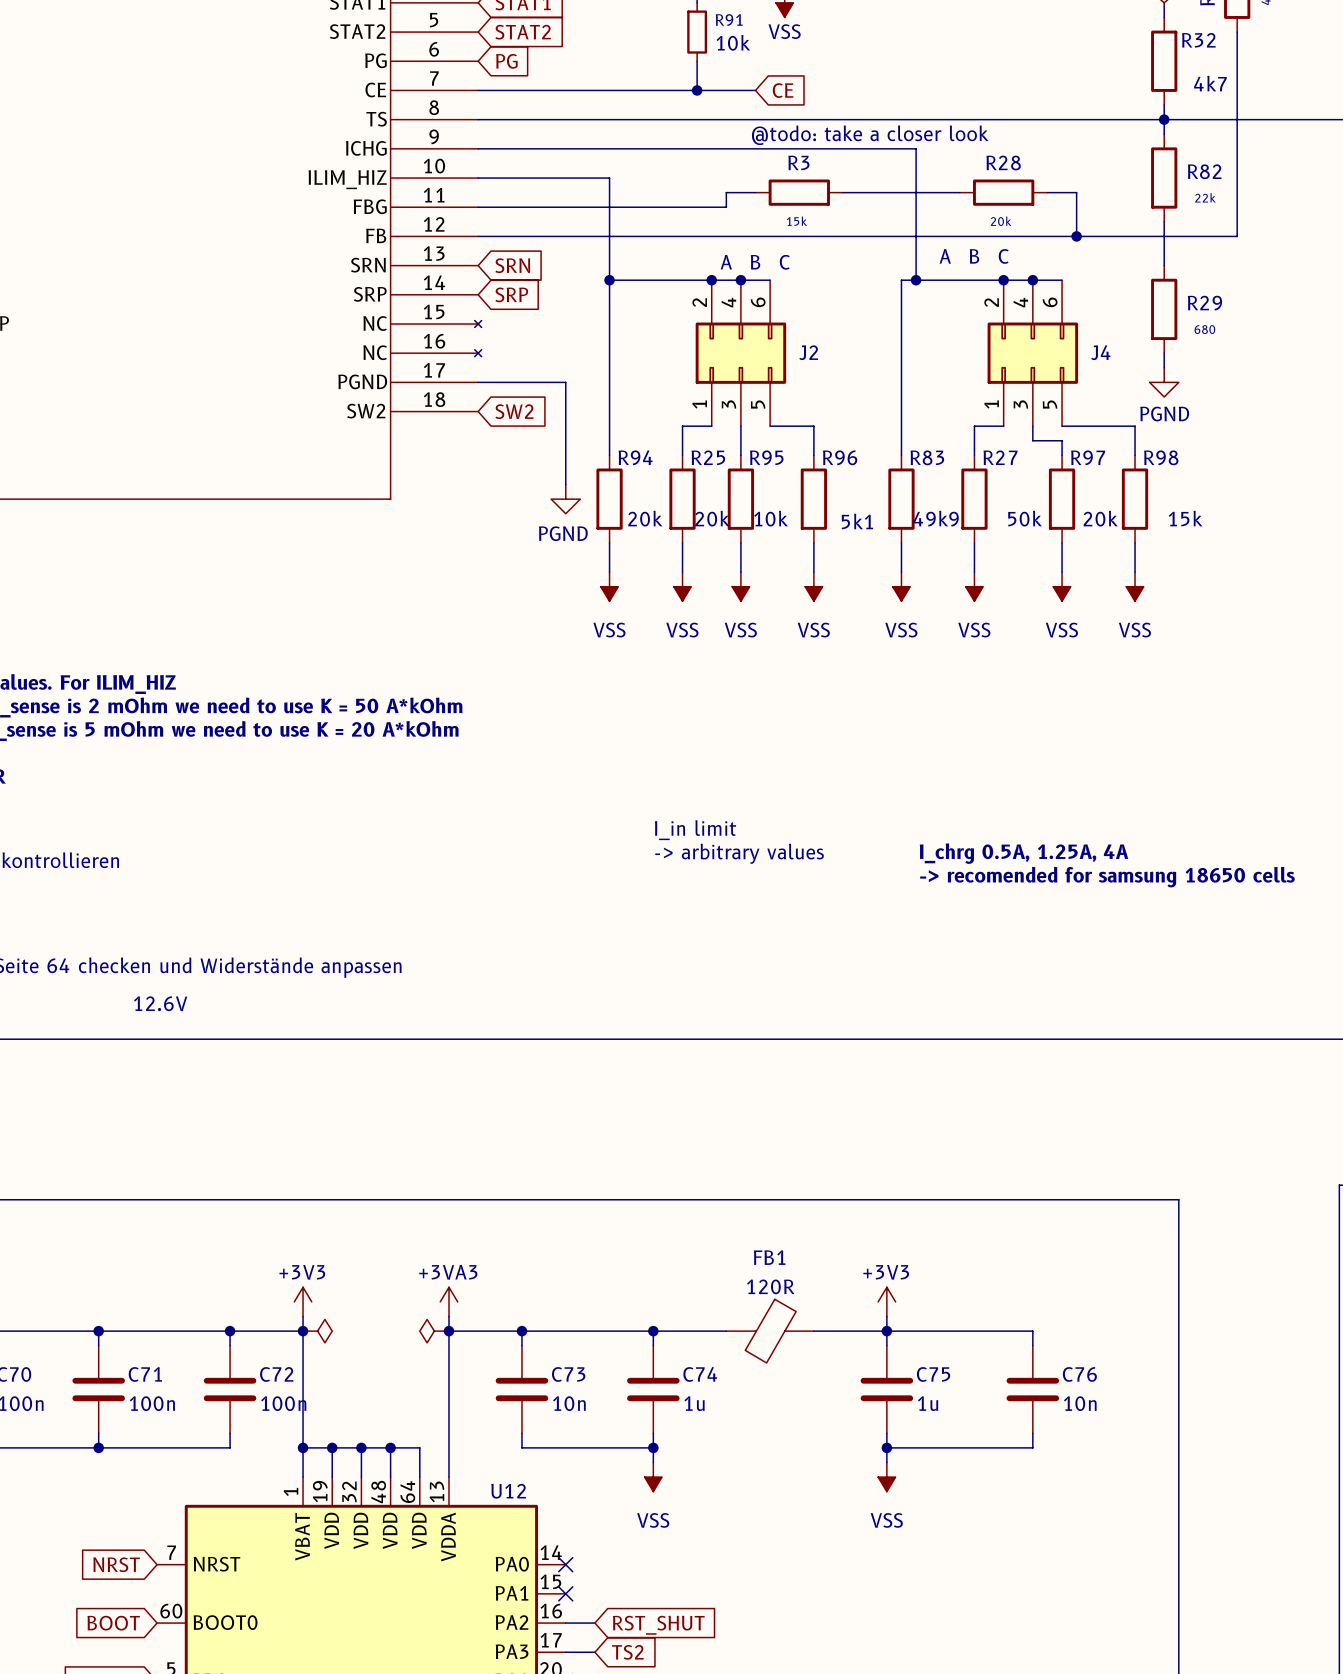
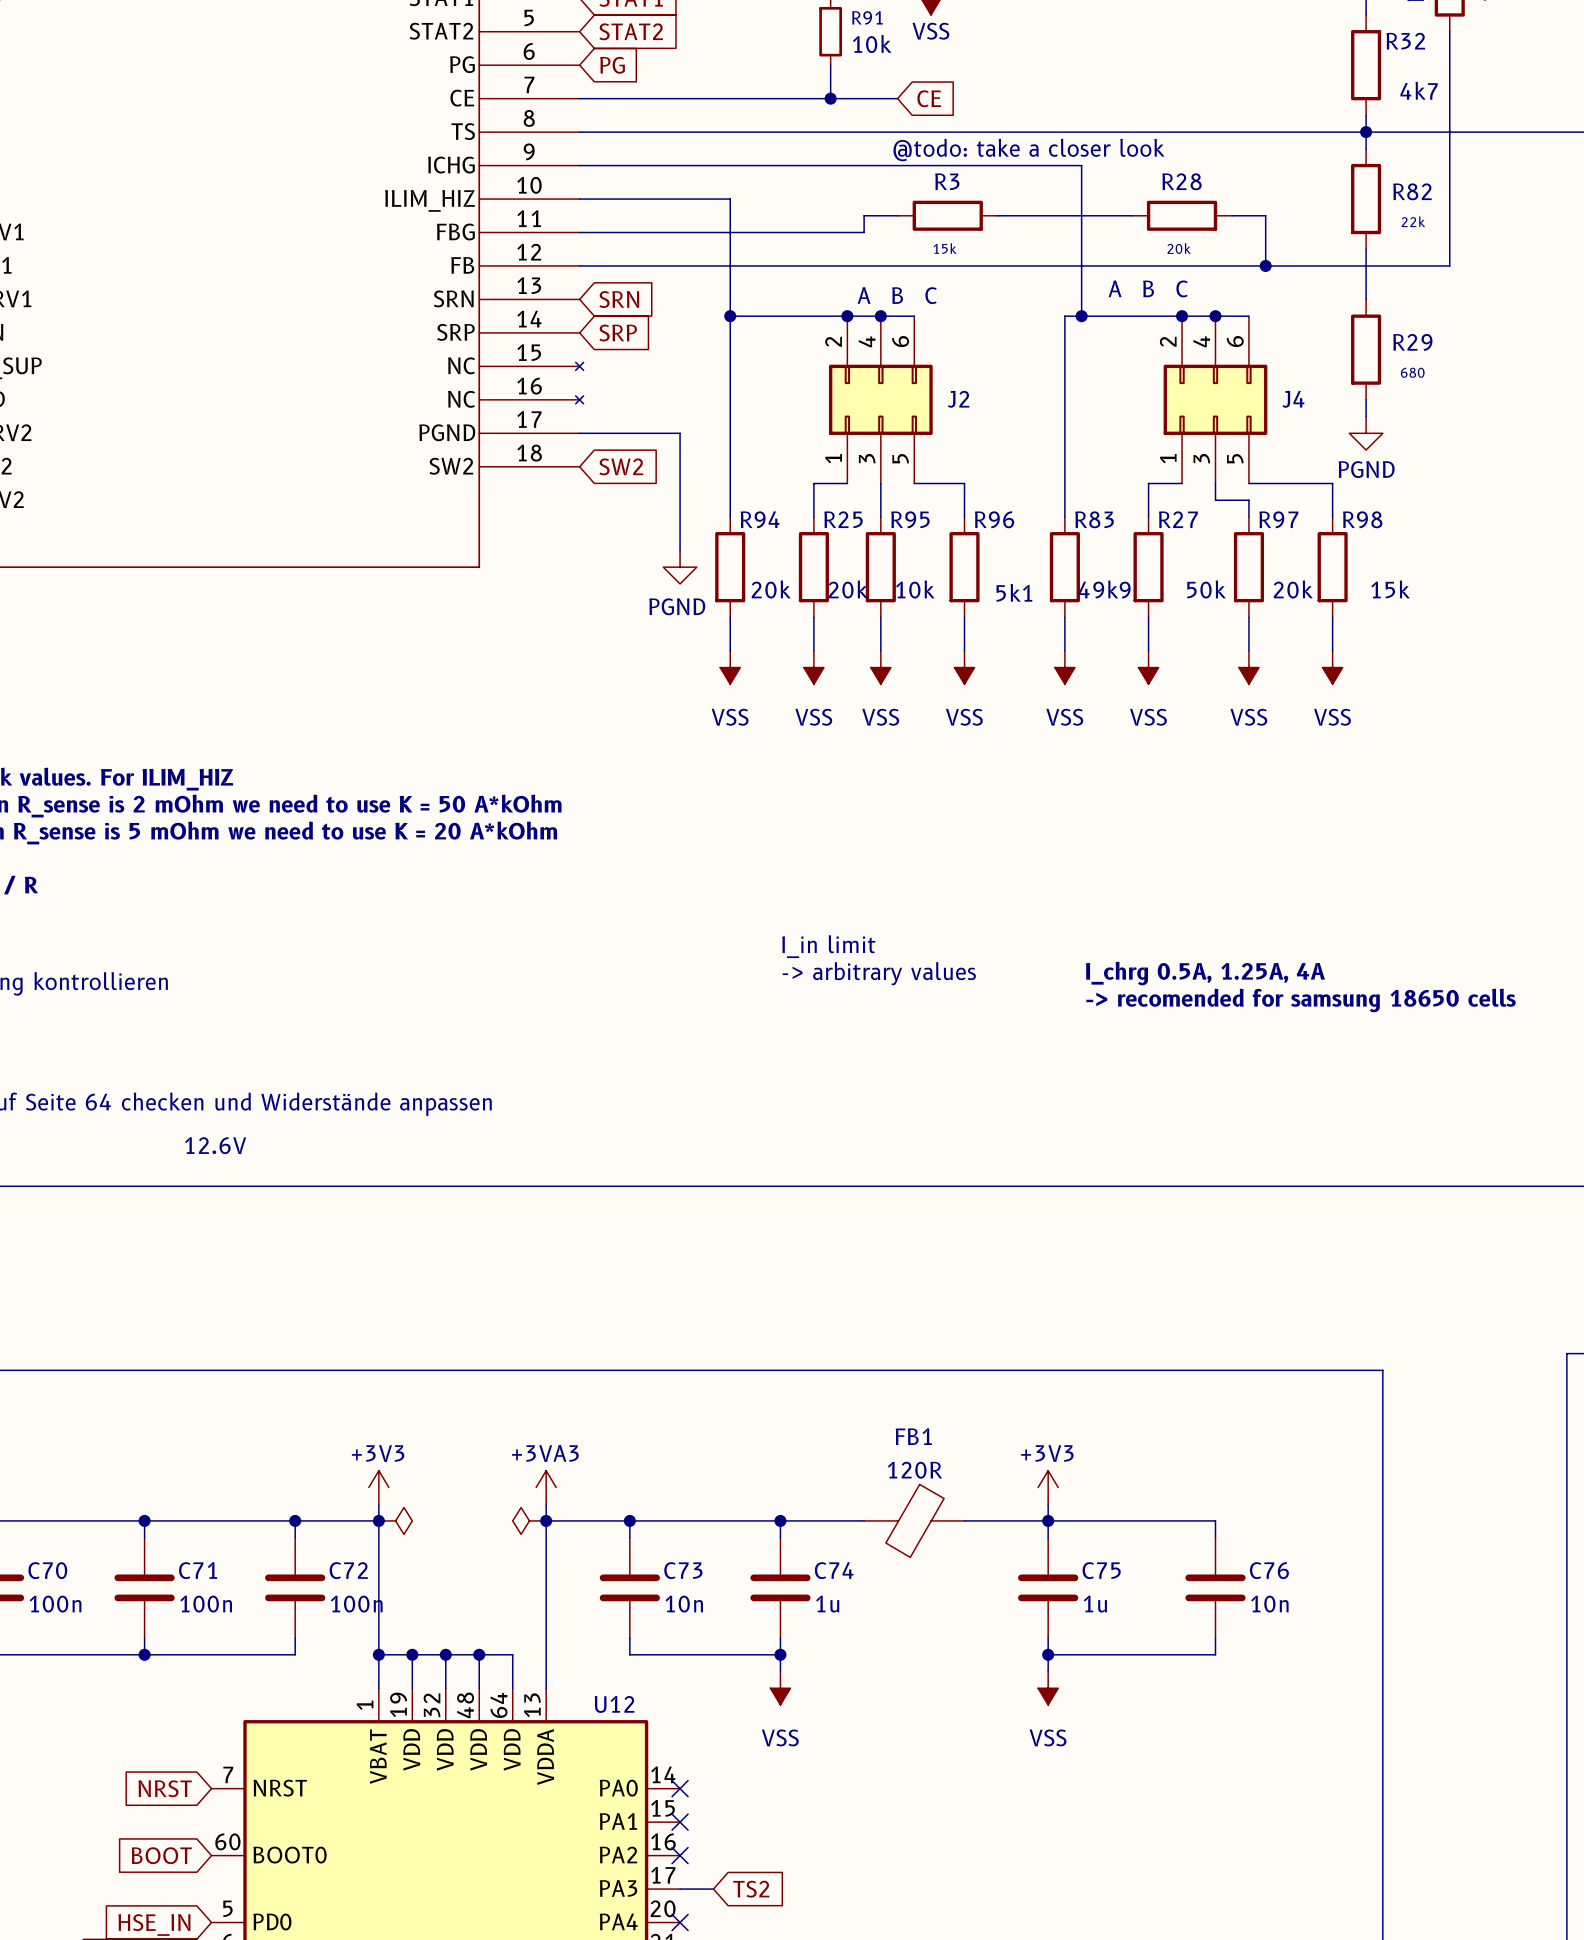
wire: (565, 1623) (594, 1623) -> none
no-connect mark: none -> (680, 1855)
global label: RST_SHUT (658, 1625) -> none

